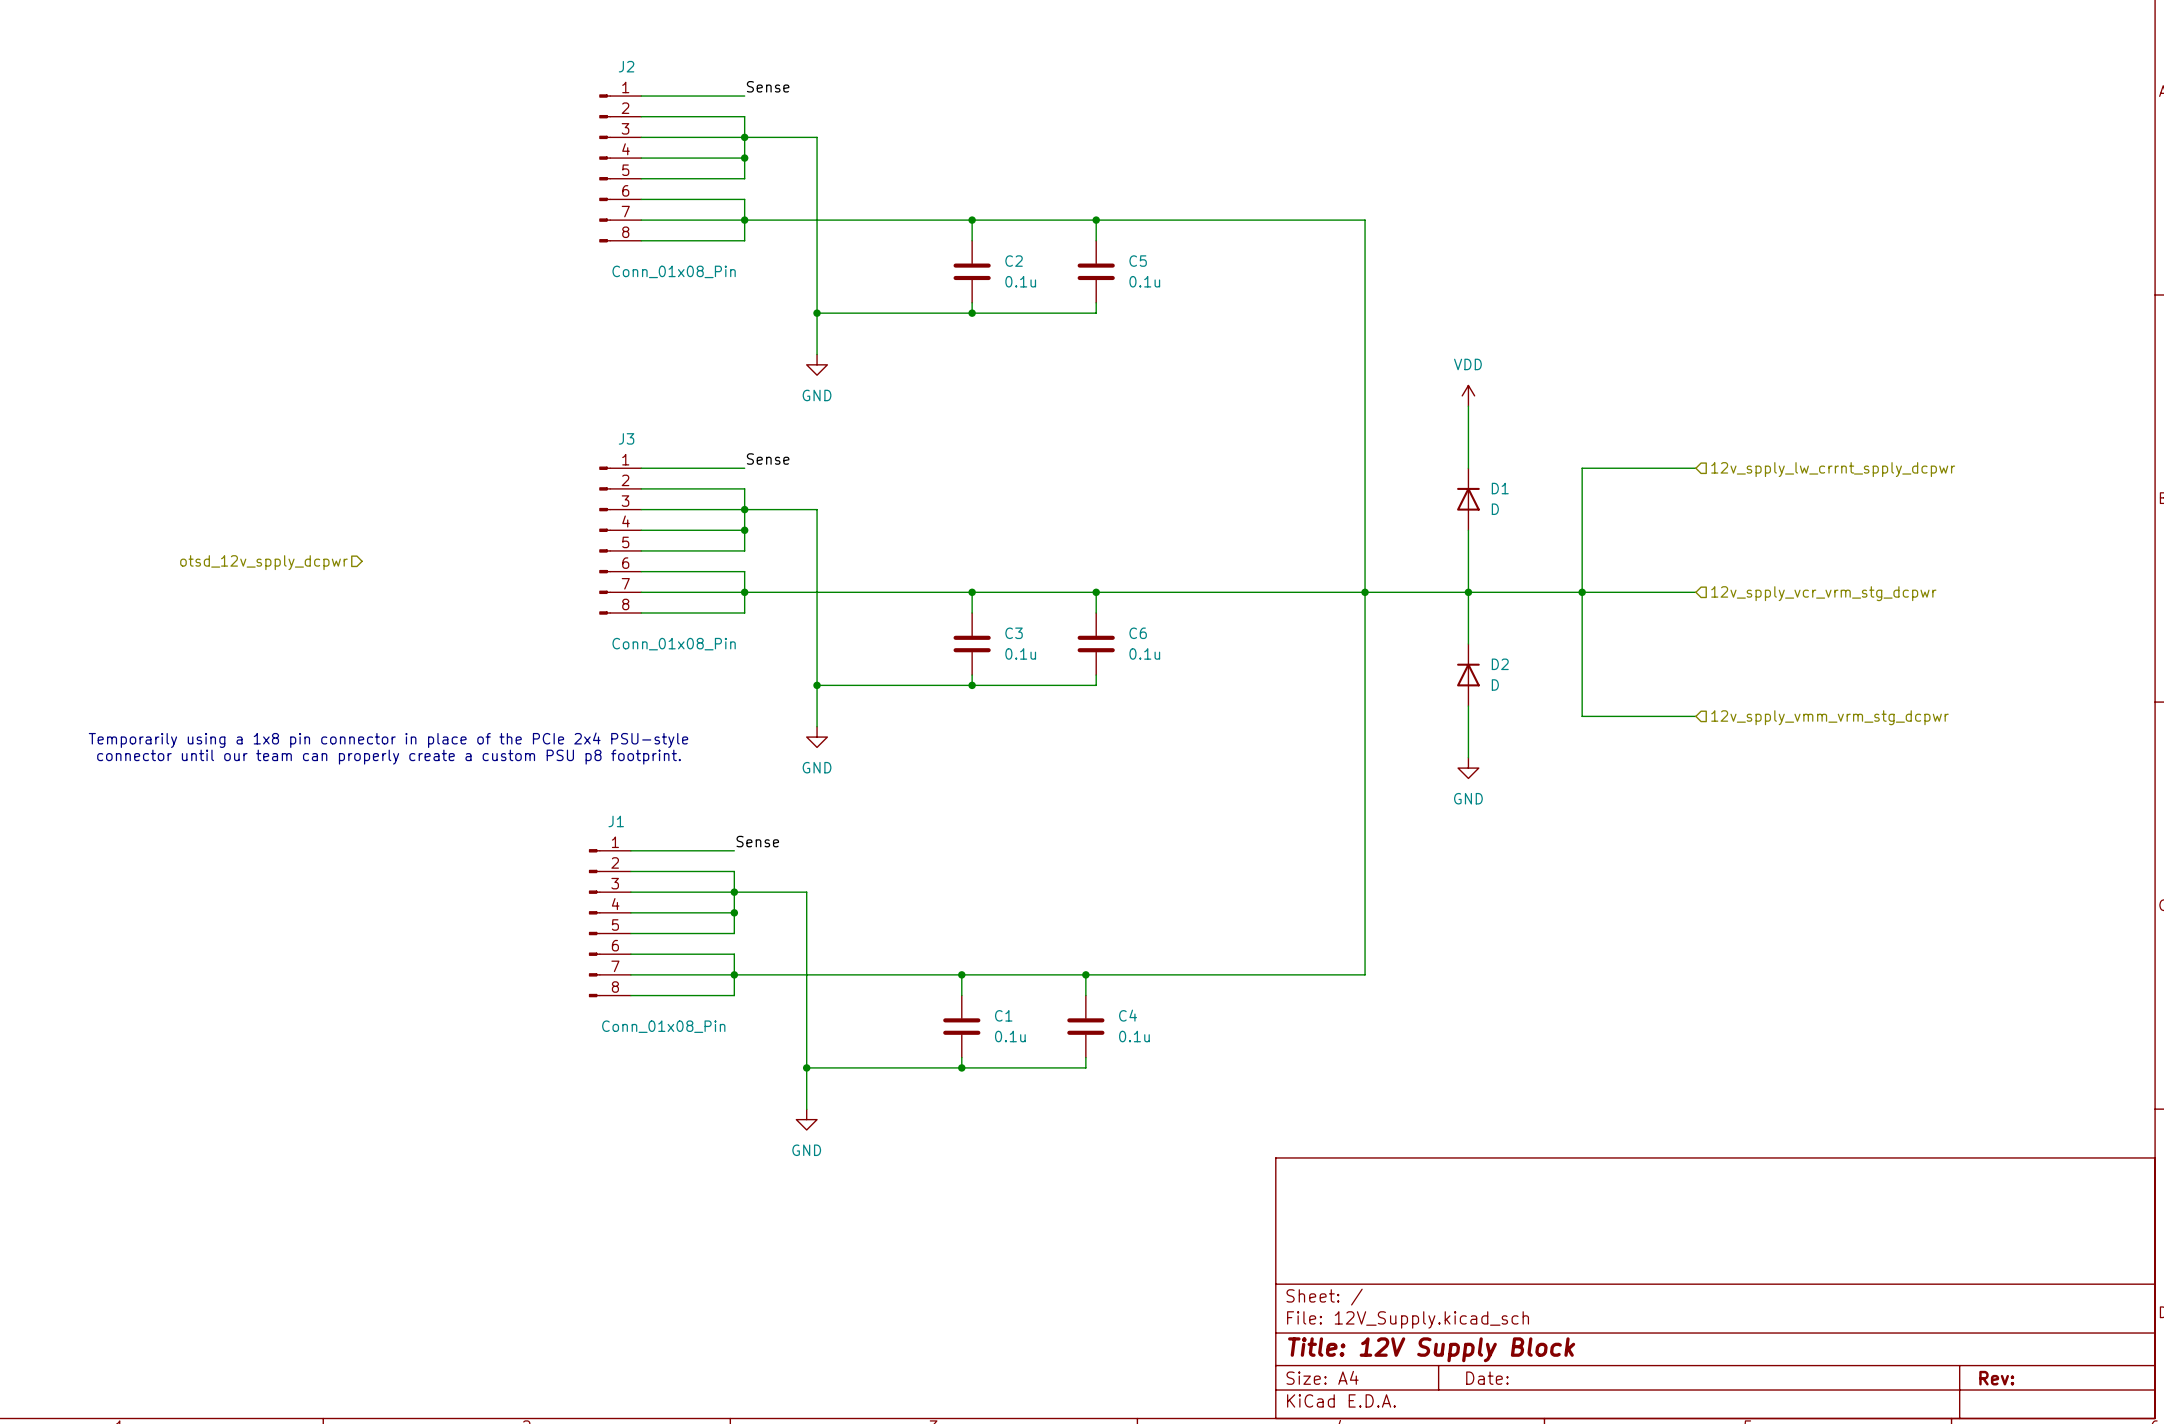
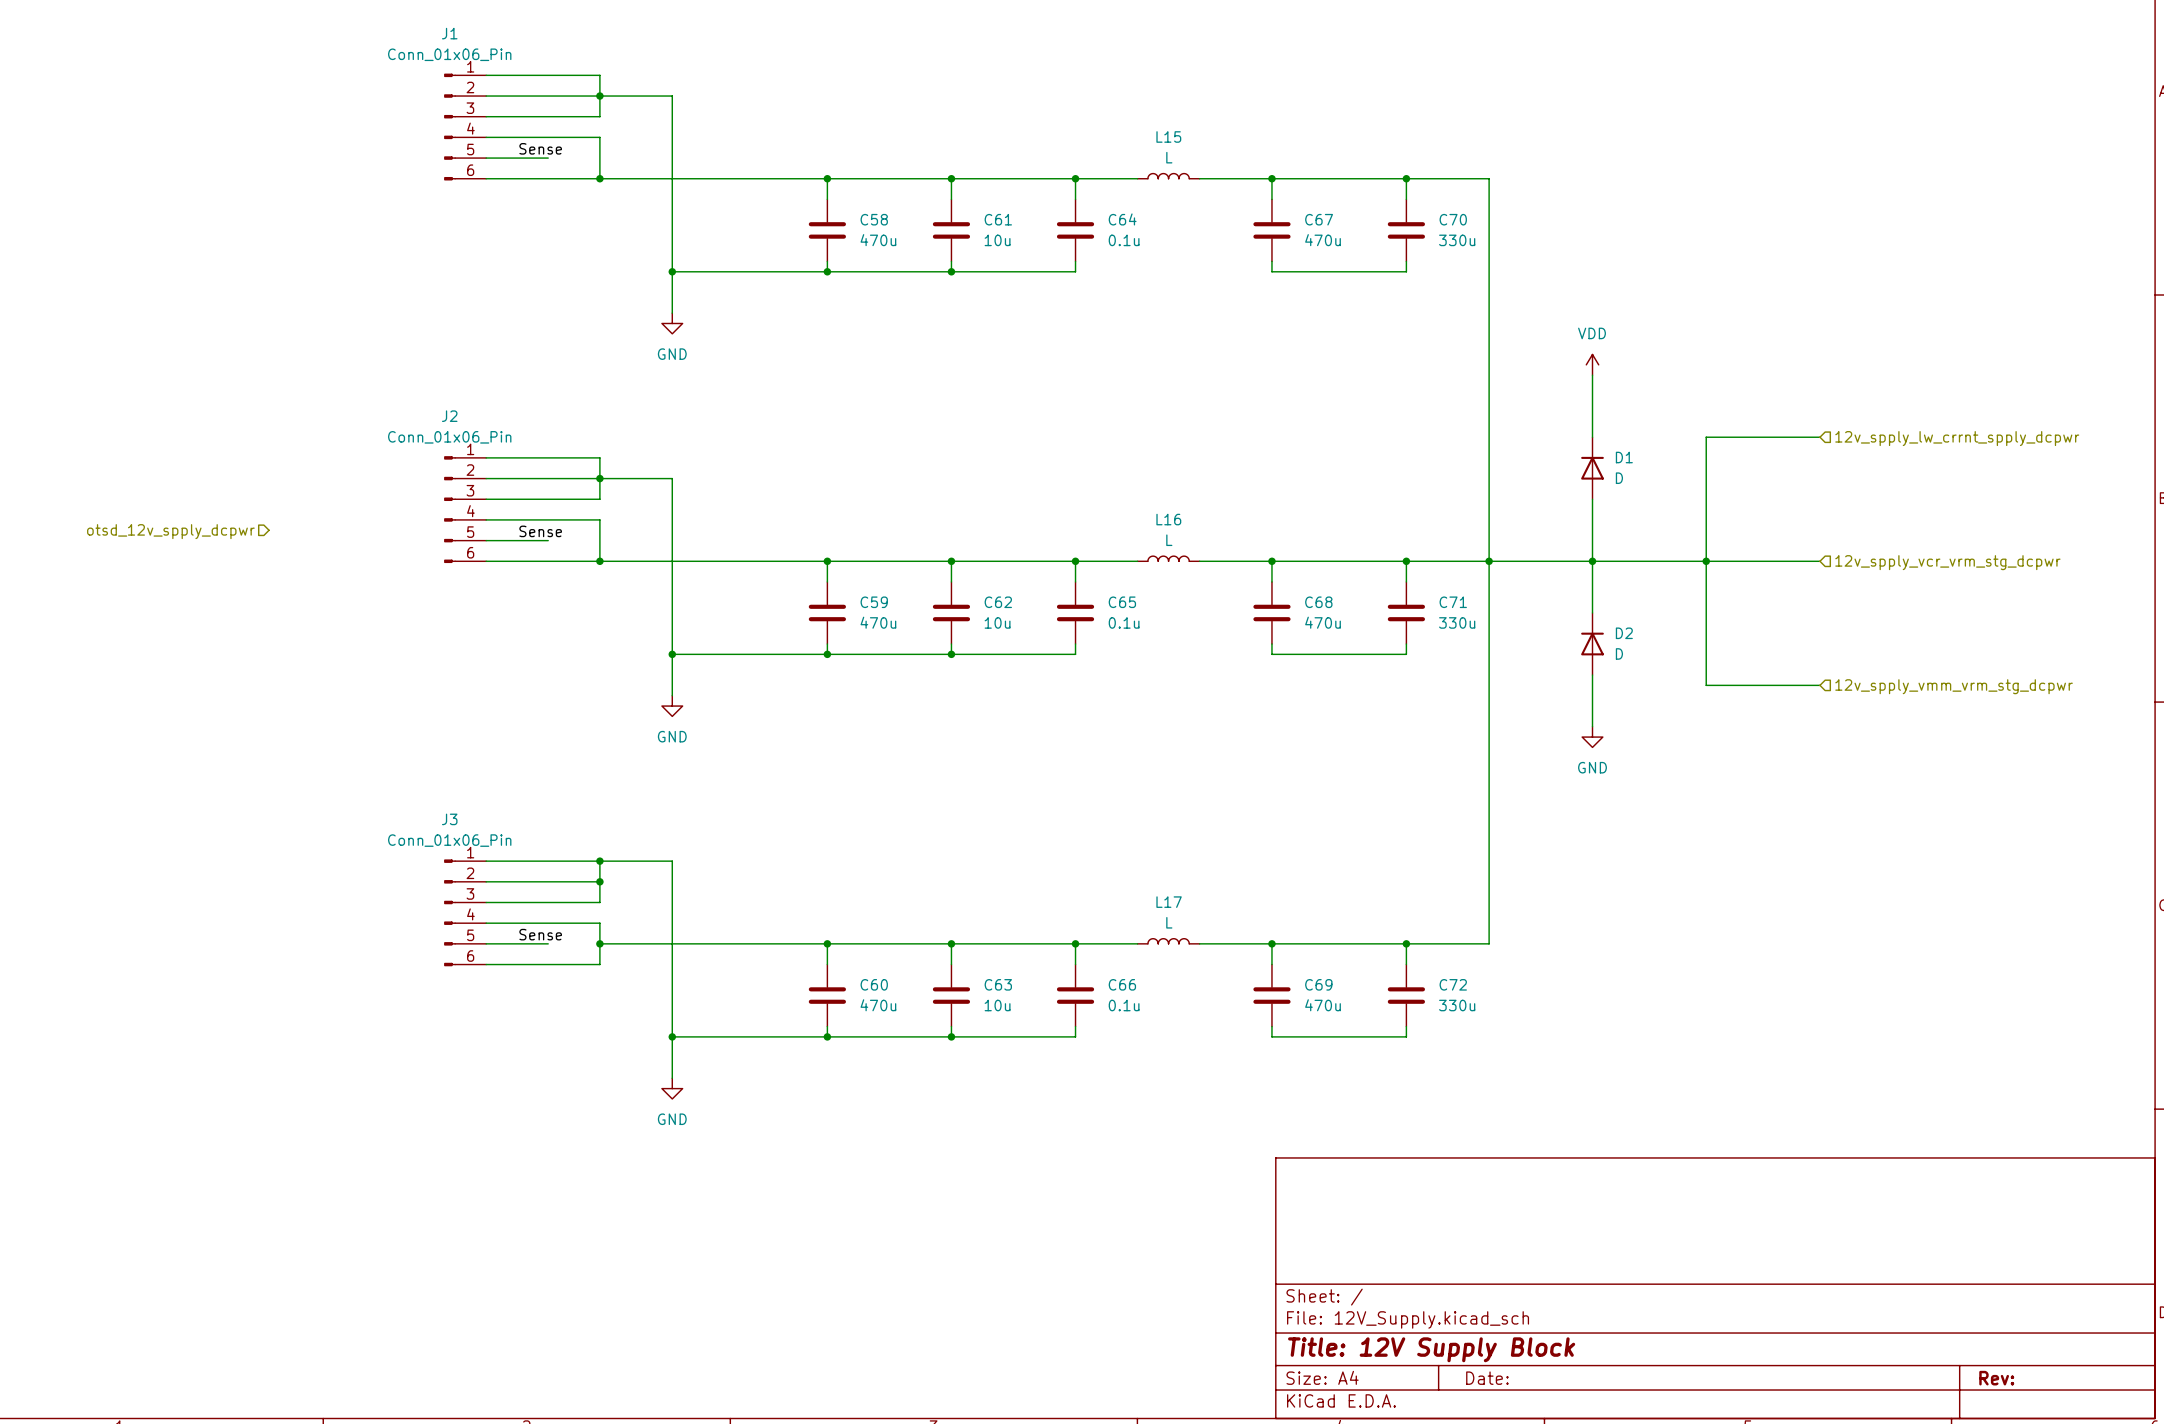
J2 name position: J2 (626, 66) -> J2 (449, 416)
wire: none -> (486, 75) (599, 75) (599, 116) (486, 116)
label: Sense (768, 86) -> none
J2 symbol: [599, 94, 642, 243] -> [444, 456, 487, 563]
wire: none -> (486, 96) (641, 96)
junction: none -> (599, 96)
wire: (672, 96) (744, 96) -> (672, 96) (672, 313)
wire: (641, 116) (744, 116) (744, 178) -> (1137, 178) (744, 178)
wire: none -> (486, 137) (599, 137) (599, 178)
wire: (641, 137) (817, 137) (817, 354) -> none
junction: (744, 137) -> none
label: none -> Sense (540, 148)
wire: none -> (486, 158) (548, 158)
wire: (641, 158) (744, 158) -> none
junction: (744, 158) -> none
L15: none -> L (1168, 176)
wire: none -> (486, 178) (641, 178)
junction: none -> (599, 178)
wire: none -> (827, 178) (827, 199)
junction: none -> (827, 178)
junction: none -> (951, 178)
wire: none -> (1199, 178) (1489, 178) (1489, 943) (1199, 943)
wire: none -> (1271, 178) (1271, 199)
junction: none -> (1271, 178)
wire: none -> (1406, 178) (1406, 199)
junction: none -> (1406, 178)
wire: (641, 199) (744, 199) (744, 240) (641, 240) -> none
wire: (641, 220) (1365, 220) (1365, 974) (630, 974) -> none
junction: (744, 220) -> none
wire: (972, 220) (972, 240) -> (951, 178) (951, 199)
junction: (972, 220) -> none
wire: (1096, 220) (1096, 240) -> (1075, 178) (1075, 199)
junction position: (1096, 220) -> (1075, 178)
C58: none -> 470u (827, 230)
C61: none -> 10u (951, 230)
C64: none -> 0.1u (1075, 230)
C67: none -> 470u (1271, 230)
C70: none -> 330u (1406, 230)
wire: none -> (827, 261) (827, 271)
wire: none -> (1075, 261) (1075, 271) (672, 271)
wire: none -> (1271, 261) (1271, 271) (1406, 271) (1406, 261)
junction: none -> (672, 271)
J2 value: Conn_01x08_Pin (674, 271) -> Conn_01x06_Pin (449, 437)
junction: none -> (951, 271)
C2: 0.1u (972, 271) -> none
C5: 0.1u (1096, 271) -> none
wire: (972, 302) (972, 313) -> (951, 261) (951, 271)
wire: (1096, 302) (1096, 313) (817, 313) -> none
junction position: (817, 313) -> (827, 271)
junction: (972, 313) -> none
power symbol position: GND (817, 364) -> GND (672, 323)
power symbol position: VDD (1468, 395) -> VDD (1592, 364)
wire: (1468, 406) (1468, 468) -> (1592, 375) (1592, 437)
J3 name position: J3 (626, 438) -> J3 (449, 819)
wire: none -> (486, 457) (599, 457) (599, 499) (486, 499)
label: Sense (768, 459) -> none
J3 symbol: [599, 466, 642, 615] -> [444, 859, 487, 967]
wire: (641, 468) (744, 468) -> none
wire: (1695, 468) (1582, 468) (1582, 716) (1695, 716) -> (1819, 437) (1706, 437) (1706, 685) (1819, 685)
hierarchical label position: 12v_spply_lw_crrnt_spply_dcpwr (1833, 469) -> 12v_spply_lw_crrnt_spply_dcpwr (1957, 438)
wire: none -> (486, 478) (672, 478) (672, 695)
junction: none -> (599, 478)
wire: (641, 488) (744, 488) (744, 550) (641, 550) -> none
D1 position: (1468, 499) -> (1592, 468)
wire: (641, 509) (817, 509) (817, 726) -> none
junction: (744, 509) -> none
wire: none -> (486, 519) (599, 519) (599, 561)
wire: (641, 530) (744, 530) -> none
junction: (744, 530) -> none
wire: (1468, 530) (1468, 644) -> (1592, 499) (1592, 612)
label: none -> Sense (540, 531)
wire: none -> (486, 540) (548, 540)
L16: none -> L (1168, 558)
wire: none -> (486, 561) (1137, 561)
junction: none -> (599, 561)
wire: none -> (827, 561) (827, 581)
junction: none -> (827, 561)
junction: none -> (951, 561)
wire: none -> (1199, 561) (1819, 561)
wire: none -> (1271, 561) (1271, 581)
junction: none -> (1271, 561)
wire: none -> (1406, 561) (1406, 581)
junction: none -> (1406, 561)
junction: none -> (1489, 561)
junction: none -> (1706, 561)
hierarchical label position: otsd_12v_spply_dcpwr (263, 562) -> otsd_12v_spply_dcpwr (170, 531)
wire: (641, 571) (744, 571) (744, 612) (641, 612) -> none
wire: (641, 592) (1695, 592) -> none
junction: (744, 592) -> none
wire: (972, 592) (972, 612) -> (951, 561) (951, 581)
junction: (972, 592) -> none
wire: (1096, 592) (1096, 612) -> (1075, 561) (1075, 581)
junction position: (1096, 592) -> (1075, 561)
junction: (1365, 592) -> none
junction: (1468, 592) -> none
junction position: (1582, 592) -> (1592, 561)
hierarchical label position: 12v_spply_vcr_vrm_stg_dcpwr (1823, 593) -> 12v_spply_vcr_vrm_stg_dcpwr (1947, 562)
C59: none -> 470u (827, 612)
C62: none -> 10u (951, 612)
C65: none -> 0.1u (1075, 612)
C68: none -> 470u (1271, 612)
C71: none -> 330u (1406, 612)
J3 value: Conn_01x08_Pin (674, 644) -> Conn_01x06_Pin (449, 840)
wire: none -> (827, 644) (827, 654)
C3: 0.1u (972, 644) -> none
wire: none -> (1075, 644) (1075, 654) (672, 654)
C6: 0.1u (1096, 644) -> none
wire: none -> (1271, 644) (1271, 654) (1406, 654) (1406, 644)
junction: none -> (672, 654)
junction: none -> (951, 654)
wire: (972, 675) (972, 685) -> (951, 644) (951, 654)
wire: (1096, 675) (1096, 685) (817, 685) -> none
D2 position: (1468, 675) -> (1592, 644)
junction position: (817, 685) -> (827, 654)
junction: (972, 685) -> none
wire: (1468, 706) (1468, 757) -> (1592, 675) (1592, 726)
hierarchical label position: 12v_spply_vmm_vrm_stg_dcpwr (1829, 717) -> 12v_spply_vmm_vrm_stg_dcpwr (1954, 686)
power symbol position: GND (817, 737) -> GND (672, 706)
text: Temporarily using a 1x8 pin connector in place of the PCIe 2x4 PSU-style (388, 740) -> none
text: connector until our team can properly create a custom PSU p8 footprint. (388, 757) -> none
power symbol position: GND (1468, 768) -> GND (1592, 737)
J1 name position: J1 (616, 821) -> J1 (449, 33)
label: Sense (757, 841) -> none
J1 symbol: [588, 849, 631, 998] -> [444, 73, 487, 181]
wire: (630, 850) (734, 850) -> none
wire: none -> (486, 861) (672, 861) (672, 1078)
wire: none -> (599, 861) (599, 902) (486, 902)
junction: none -> (599, 861)
wire: (630, 871) (734, 871) (734, 933) (630, 933) -> none
wire: none -> (486, 881) (599, 881)
junction: none -> (599, 881)
wire: (630, 892) (806, 892) (806, 1109) -> none
junction: (734, 892) -> none
wire: (630, 912) (734, 912) -> none
junction: (734, 912) -> none
wire: none -> (486, 923) (599, 923) (599, 964) (486, 964)
label: none -> Sense (540, 934)
L17: none -> L (1168, 941)
wire: none -> (486, 943) (548, 943)
wire: none -> (599, 943) (1137, 943)
junction: none -> (599, 943)
wire: none -> (827, 943) (827, 964)
junction: none -> (827, 943)
junction: none -> (951, 943)
wire: none -> (1271, 943) (1271, 964)
junction: none -> (1271, 943)
wire: none -> (1406, 943) (1406, 964)
junction: none -> (1406, 943)
wire: (630, 954) (734, 954) (734, 995) (630, 995) -> none
junction: (734, 974) -> none
wire: (961, 974) (961, 995) -> (951, 943) (951, 964)
junction: (961, 974) -> none
wire: (1085, 974) (1085, 995) -> (1075, 943) (1075, 964)
junction position: (1085, 974) -> (1075, 943)
C60: none -> 470u (827, 995)
C63: none -> 10u (951, 995)
C66: none -> 0.1u (1075, 995)
C69: none -> 470u (1271, 995)
C72: none -> 330u (1406, 995)
J1 value: Conn_01x08_Pin (663, 1026) -> Conn_01x06_Pin (449, 54)
wire: none -> (827, 1026) (827, 1036)
C1: 0.1u (961, 1026) -> none
wire: none -> (1075, 1026) (1075, 1036) (672, 1036)
C4: 0.1u (1085, 1026) -> none
wire: none -> (1271, 1026) (1271, 1036) (1406, 1036) (1406, 1026)
junction: none -> (672, 1036)
junction: none -> (951, 1036)
wire: (961, 1057) (961, 1067) -> (951, 1026) (951, 1036)
wire: (1085, 1057) (1085, 1067) (806, 1067) -> none
junction position: (806, 1067) -> (827, 1036)
junction: (961, 1067) -> none
power symbol position: GND (806, 1119) -> GND (672, 1088)

